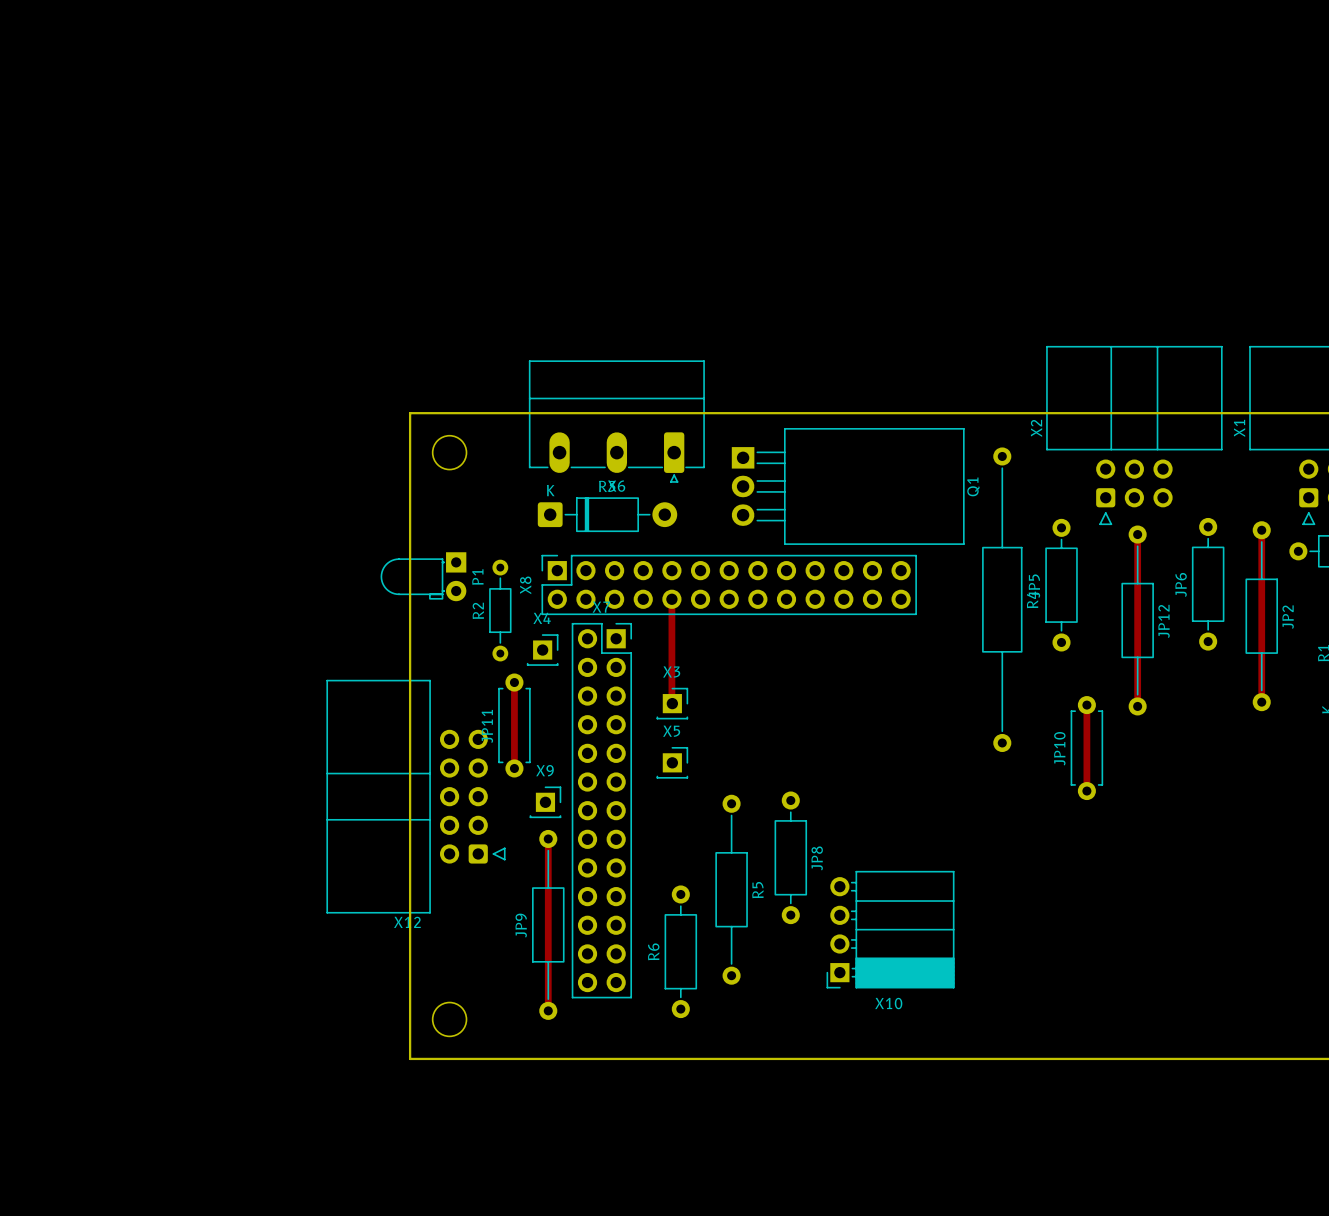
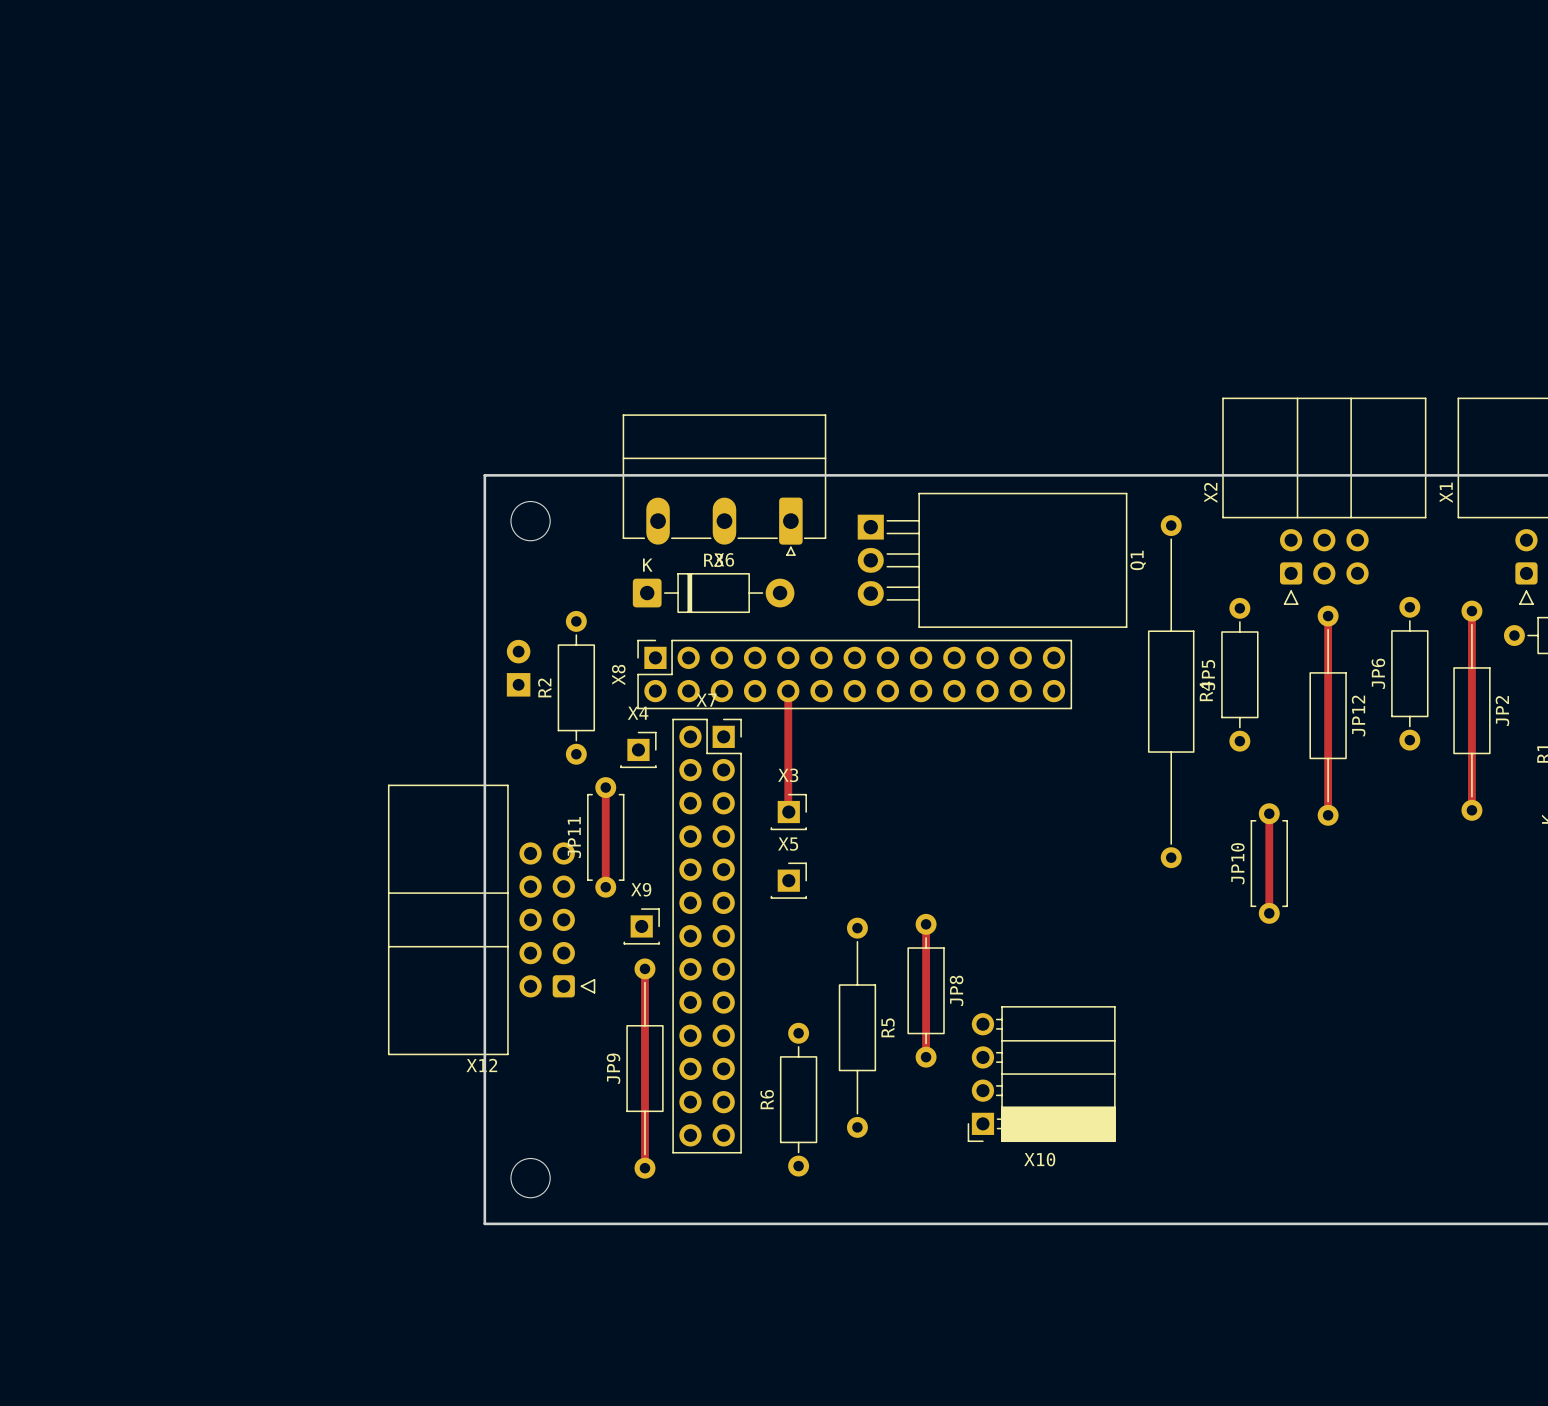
R2 footprint: [489, 559, 512, 662] -> [557, 610, 596, 765]
P1 side: top (423, 576) -> bottom (518, 668)
track: none -> (926, 924) (926, 1057)

